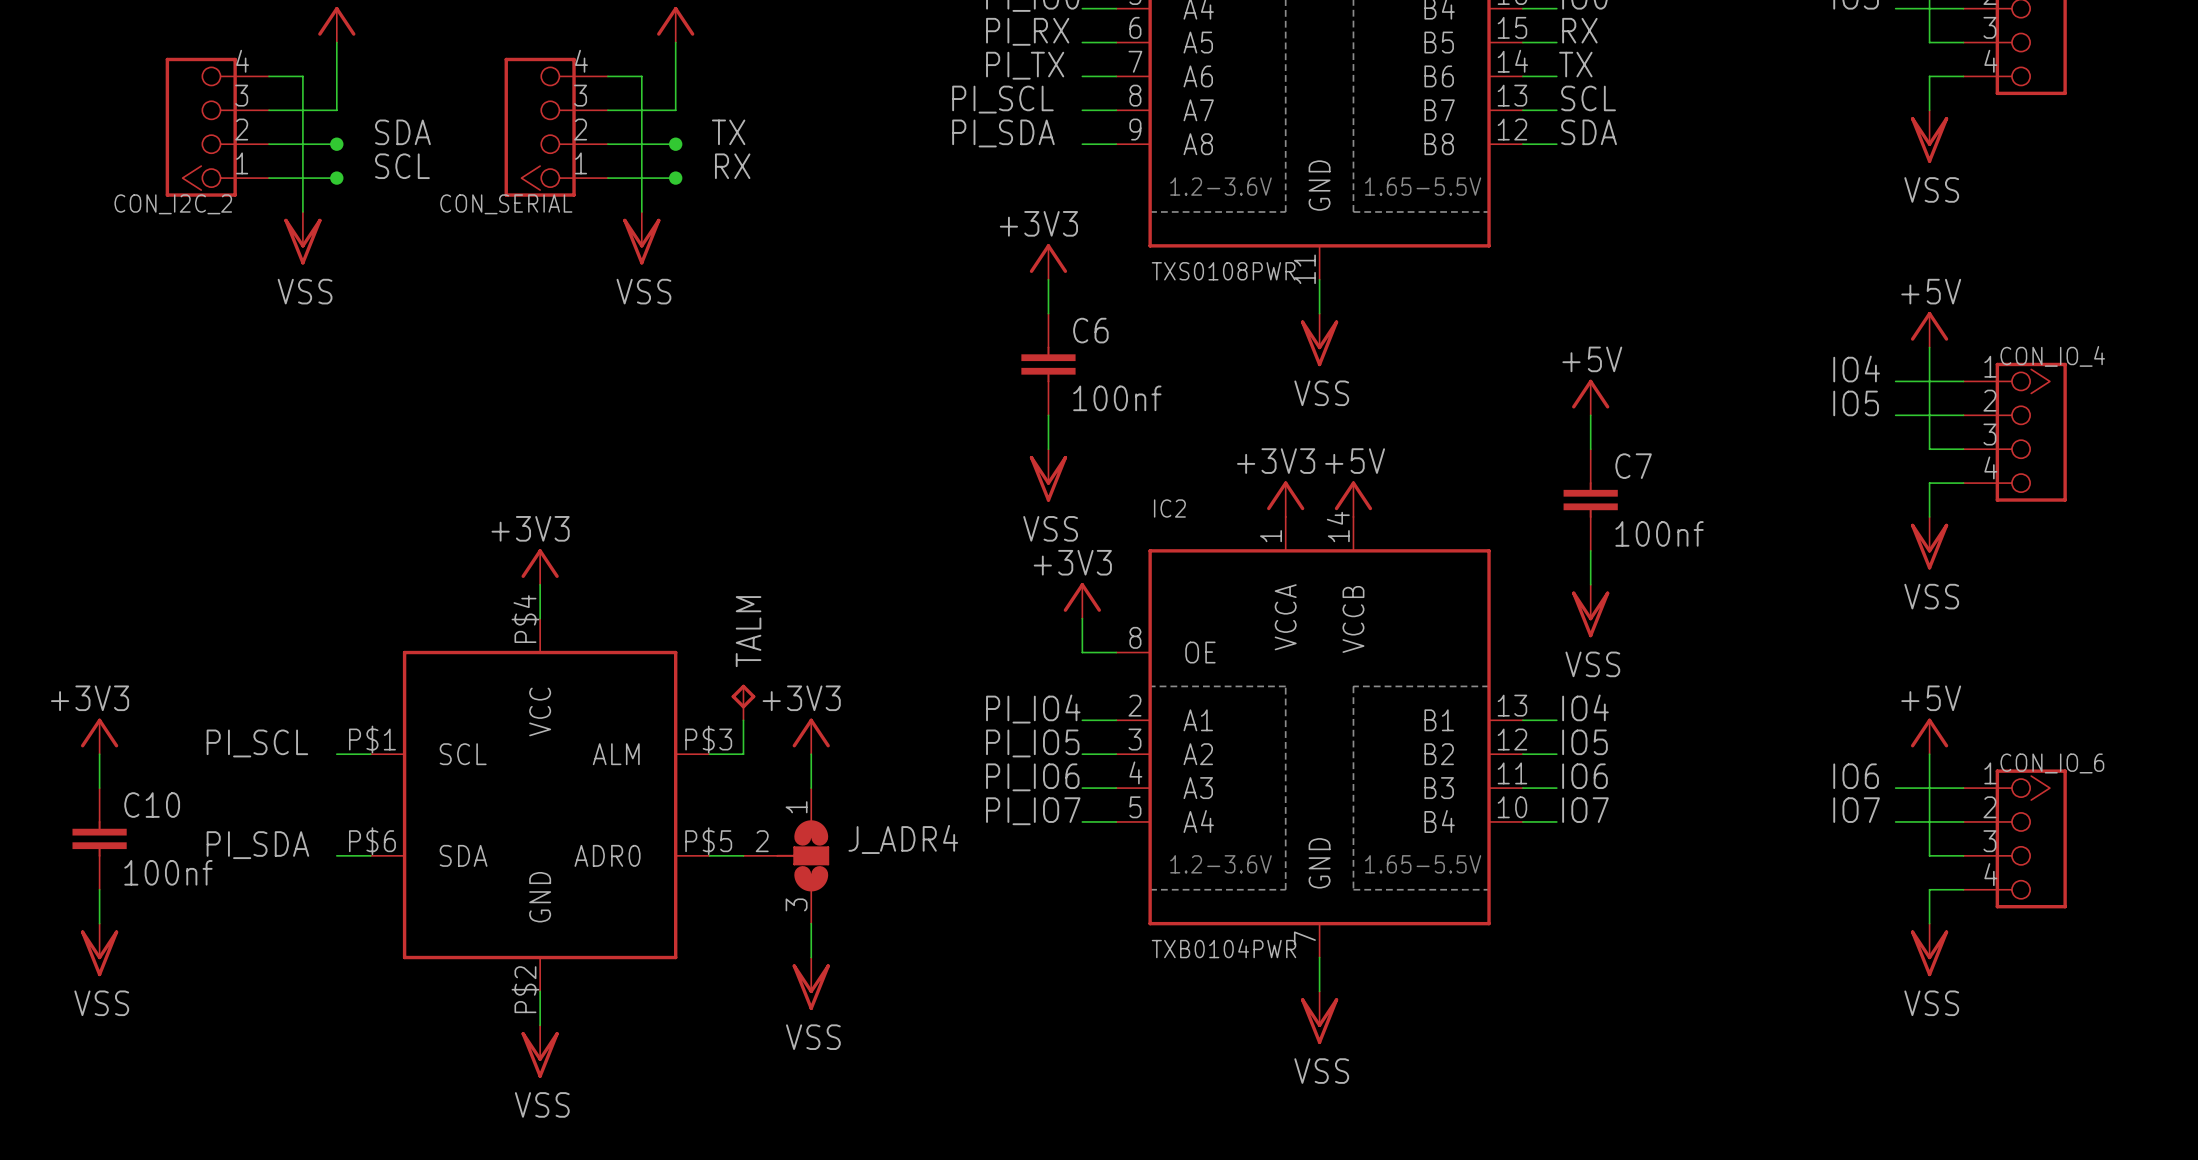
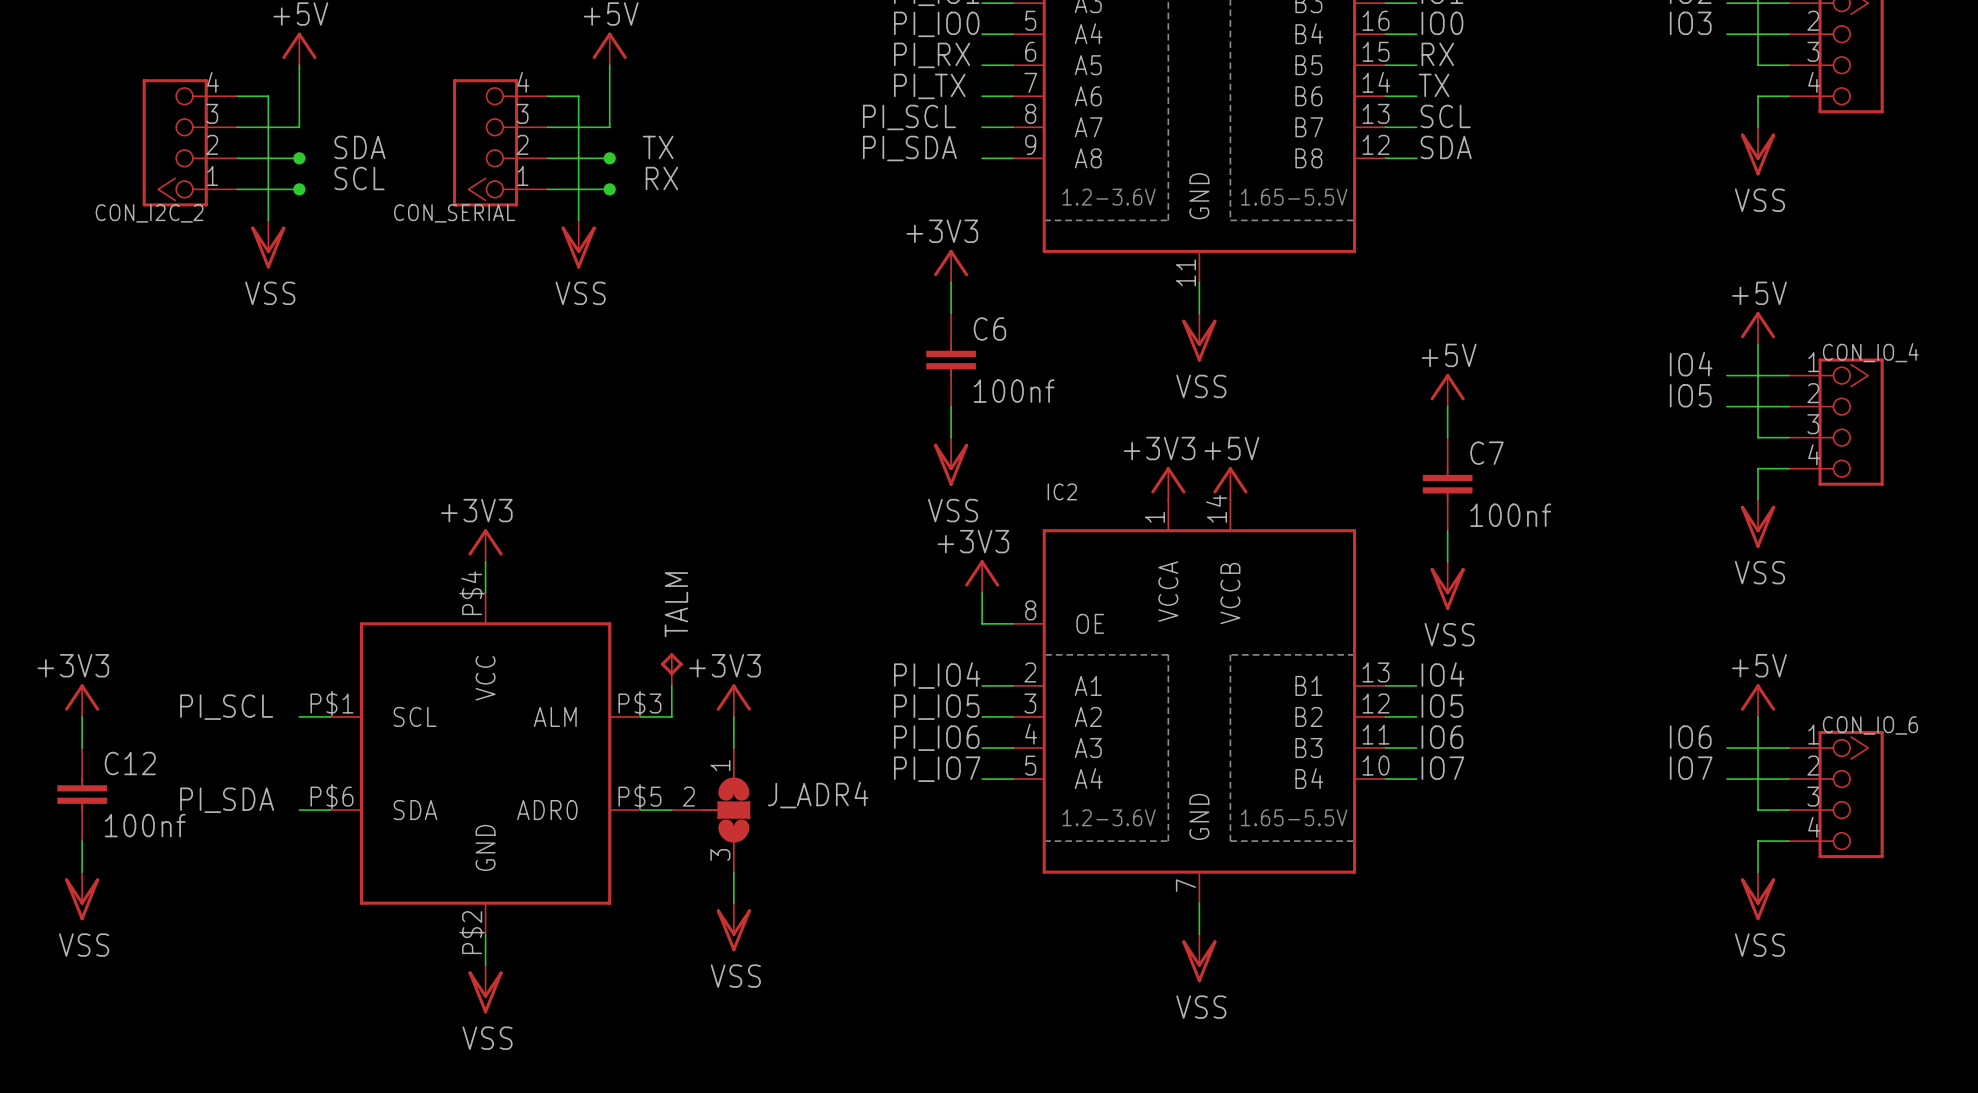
part value: TXS0108PWR (1223, 271) -> none
C10 name: C10 (152, 805) -> C12 (130, 763)
IC2 value: TXB0104PWR (1224, 948) -> none

